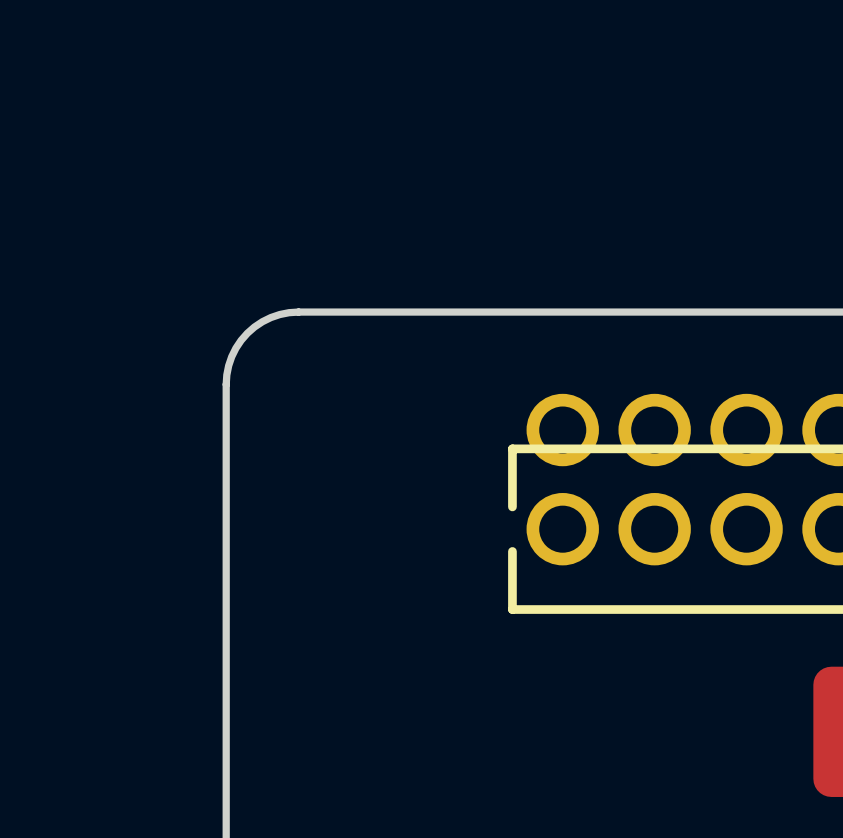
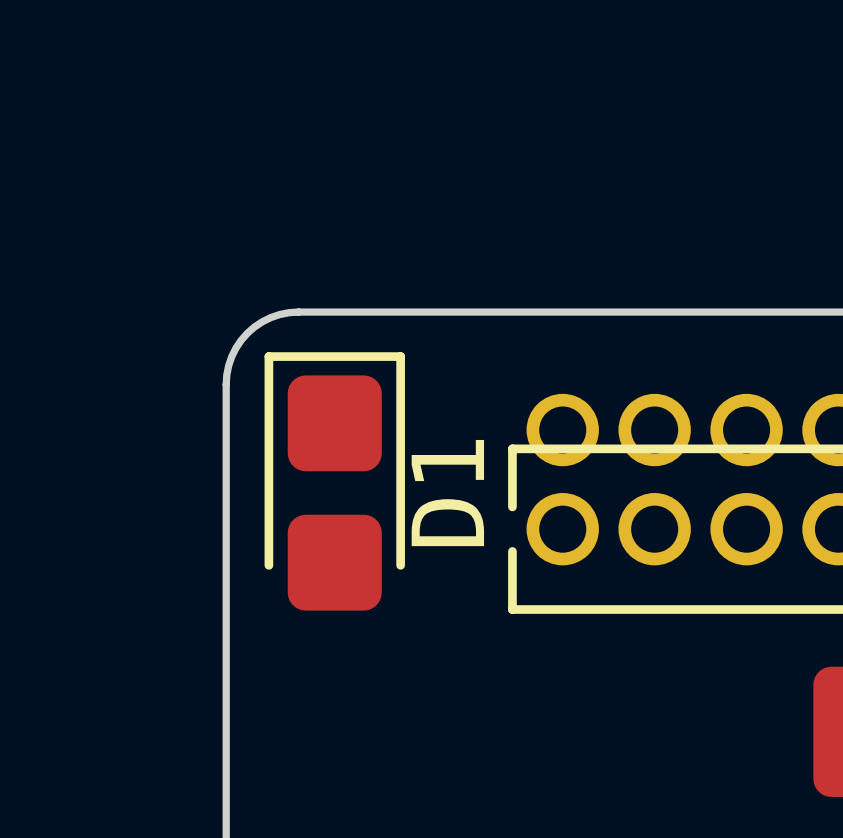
D1: none -> (334, 481)

